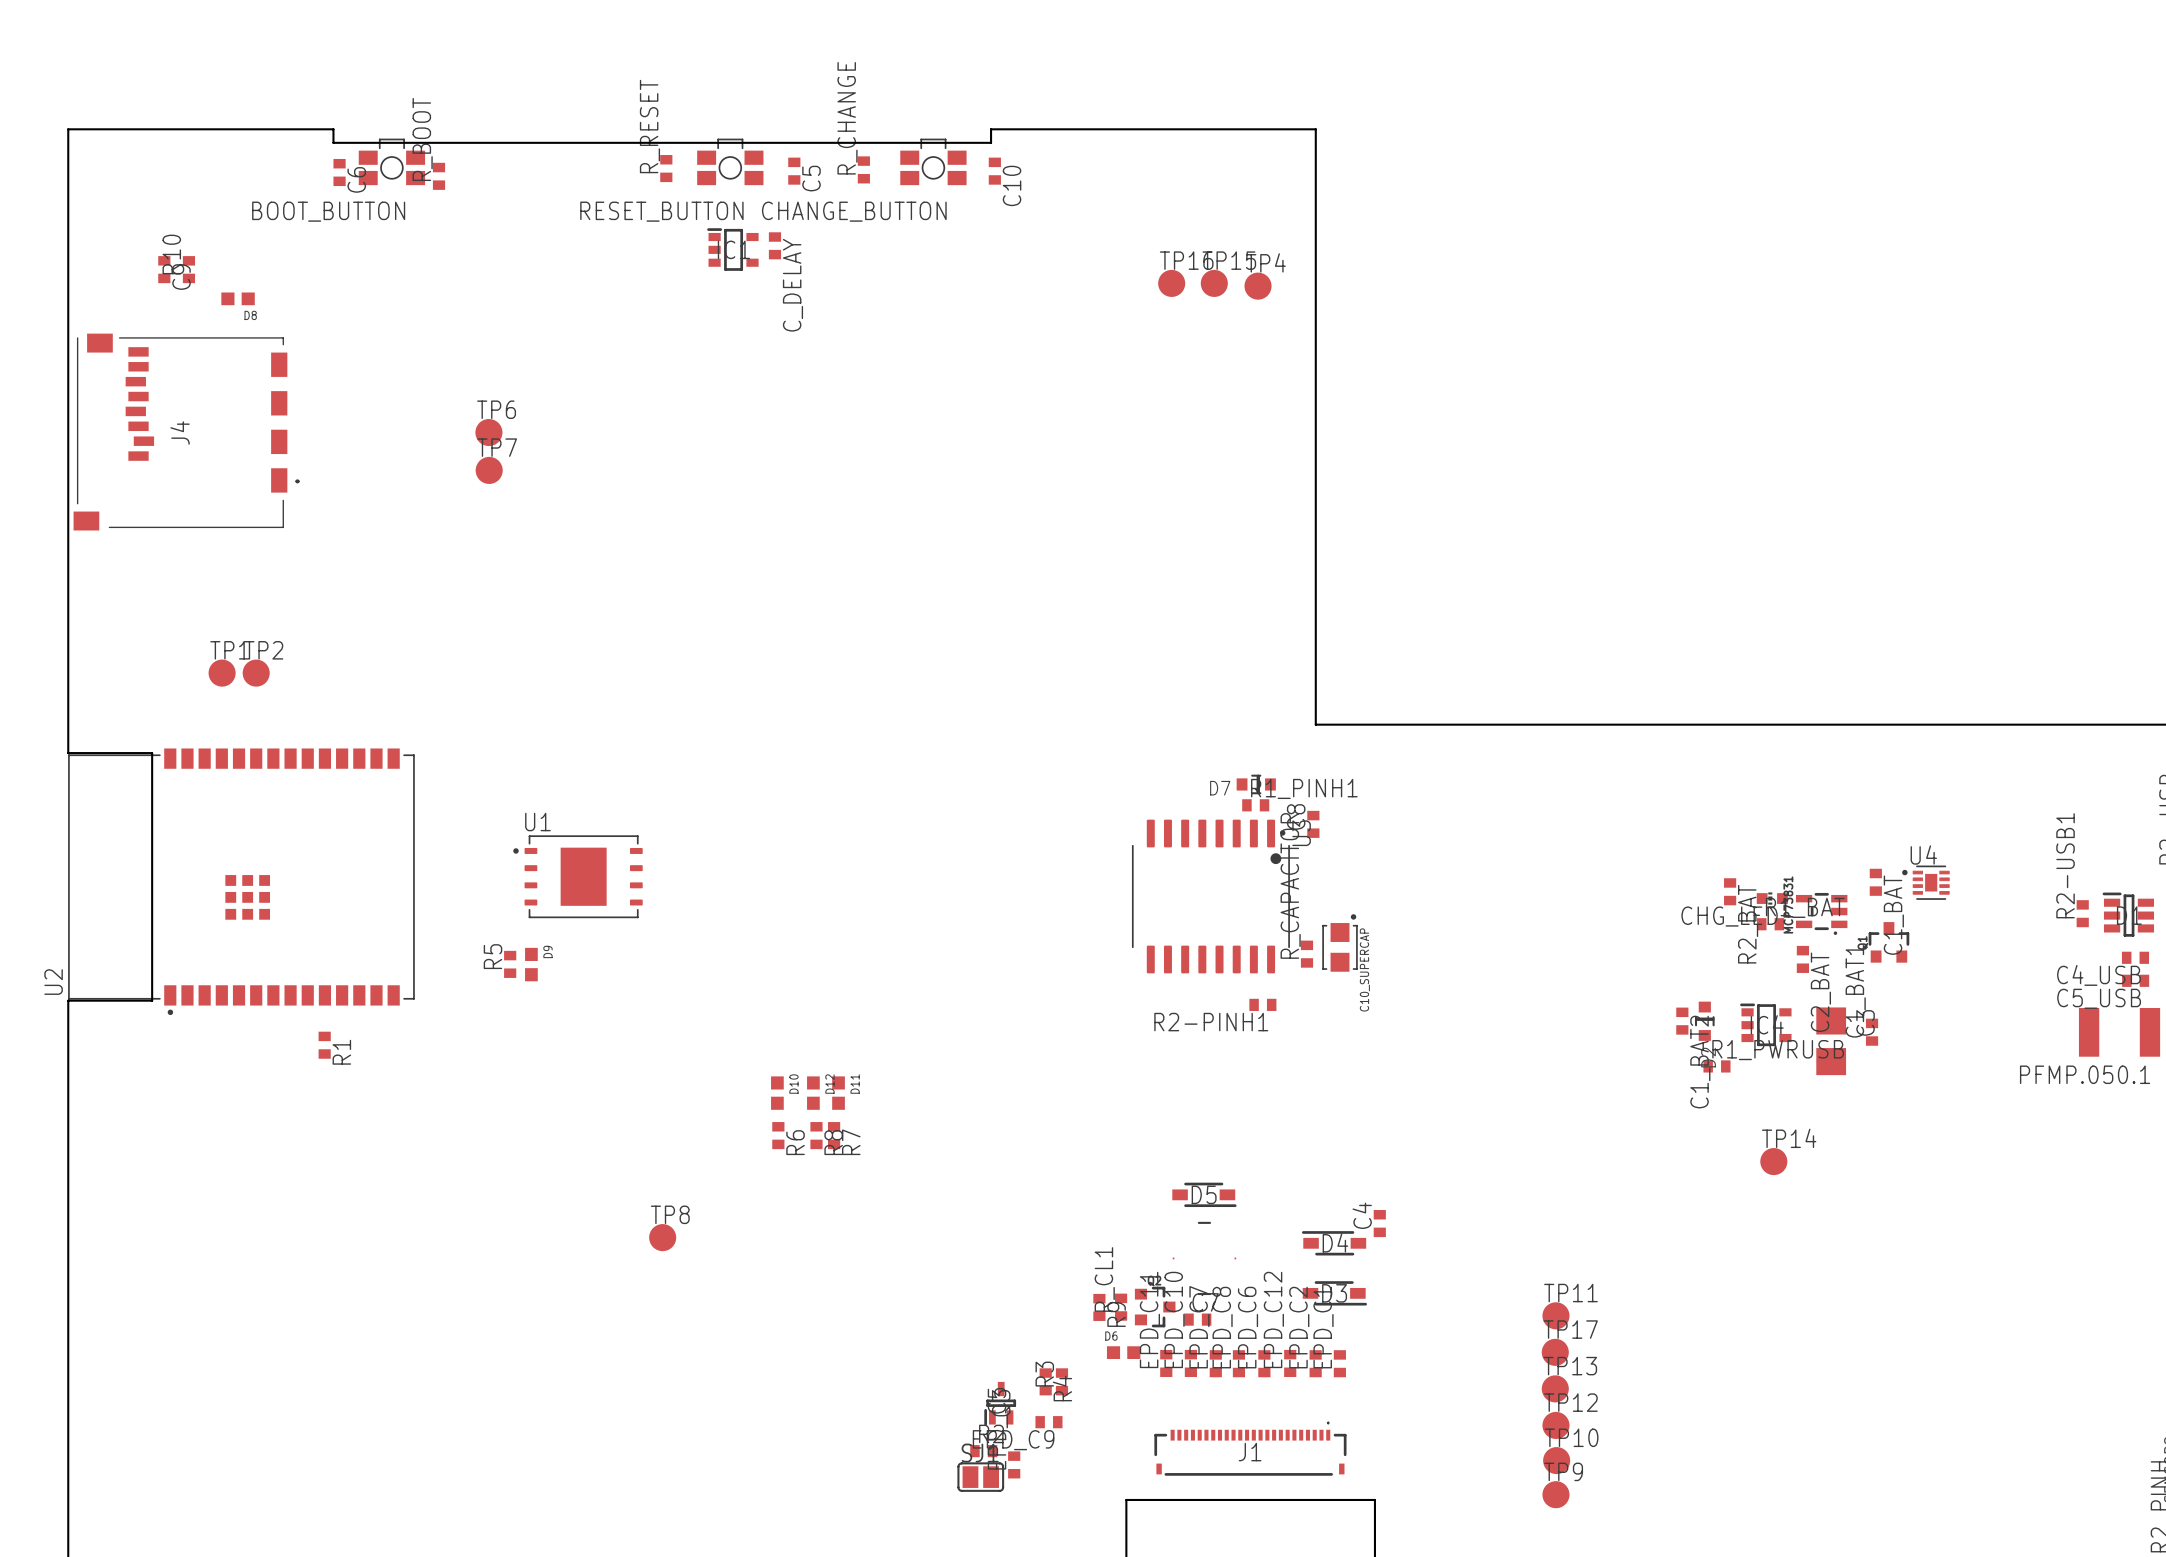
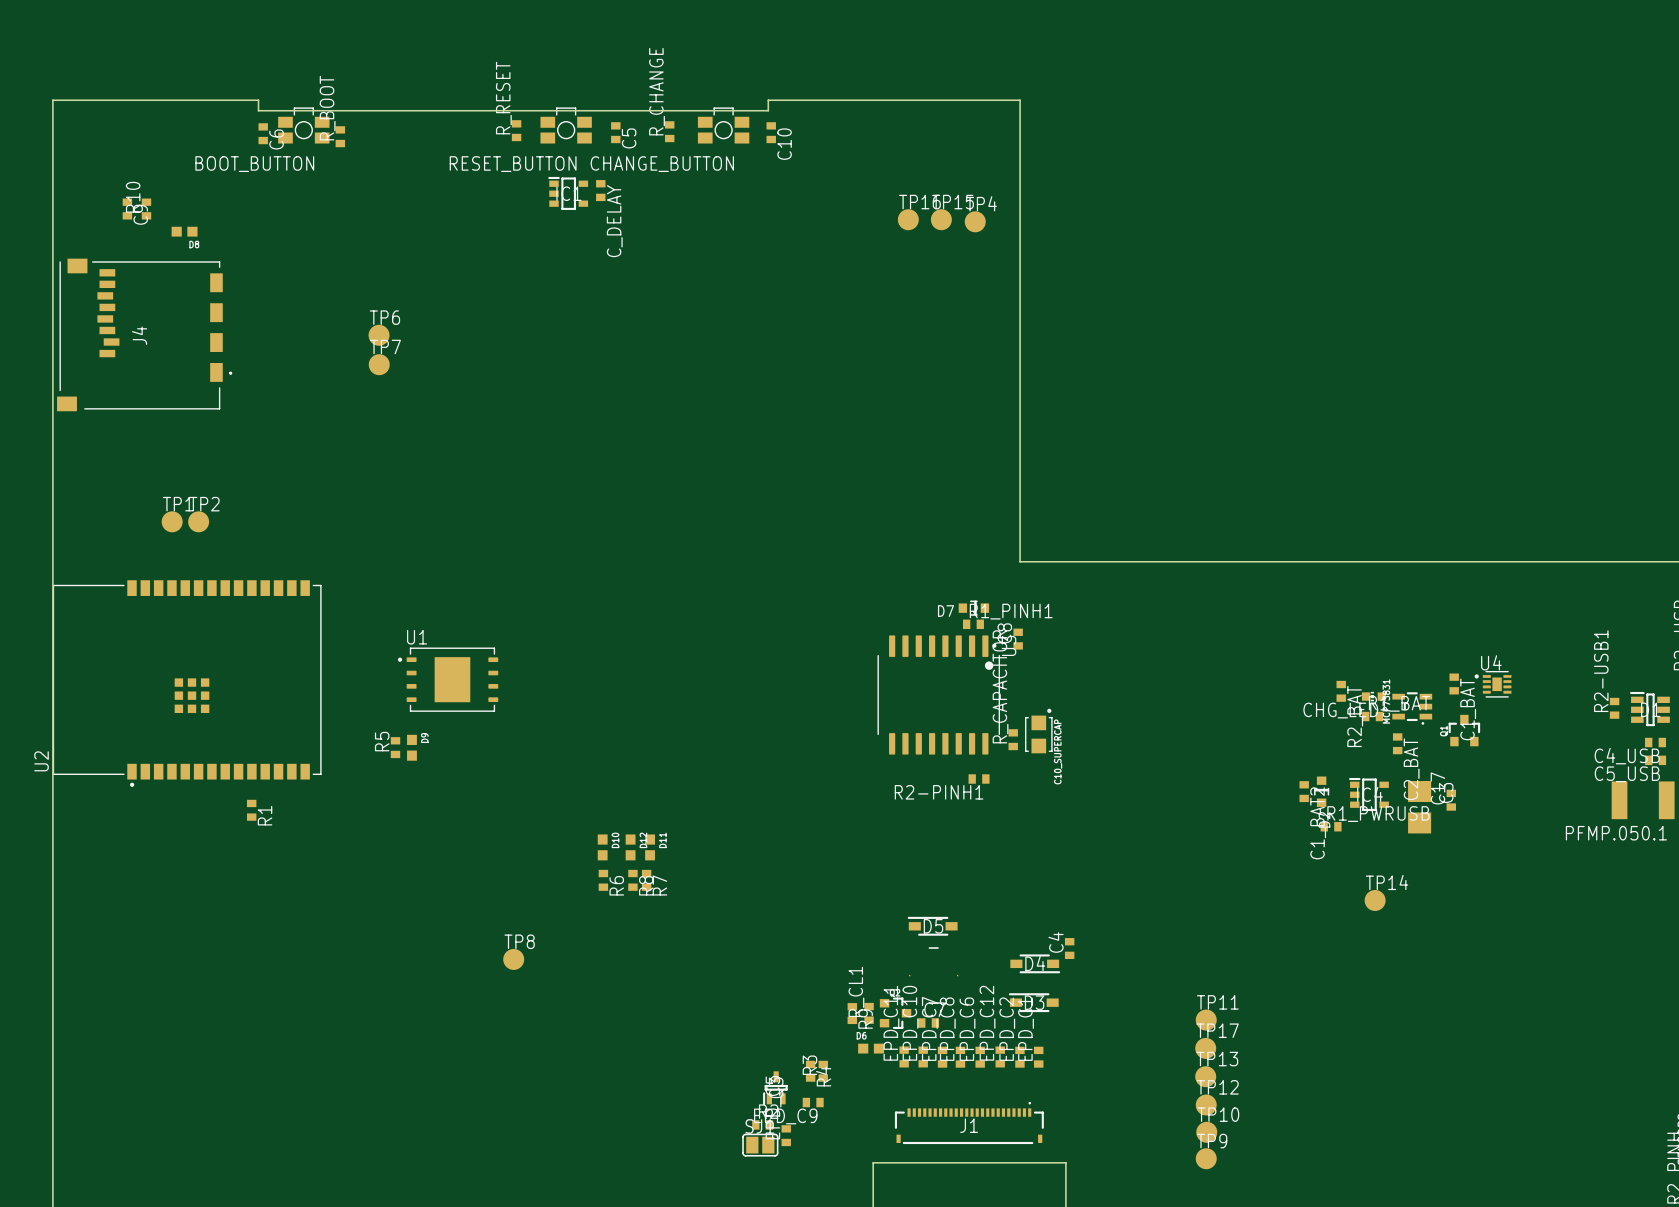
board edge: (68, 753) (152, 753) (152, 1000) (68, 1000) -> (52, 583) (52, 775)
C1_BAT1 name: C1_BAT1 (1855, 991) -> C17 (1437, 788)
D5 rotation: 0° (1204, 1194) -> 180° (932, 926)
D4 rotation: 0° (1334, 1243) -> 180° (1035, 963)
D3 rotation: 0° (1334, 1293) -> 180° (1033, 1002)

